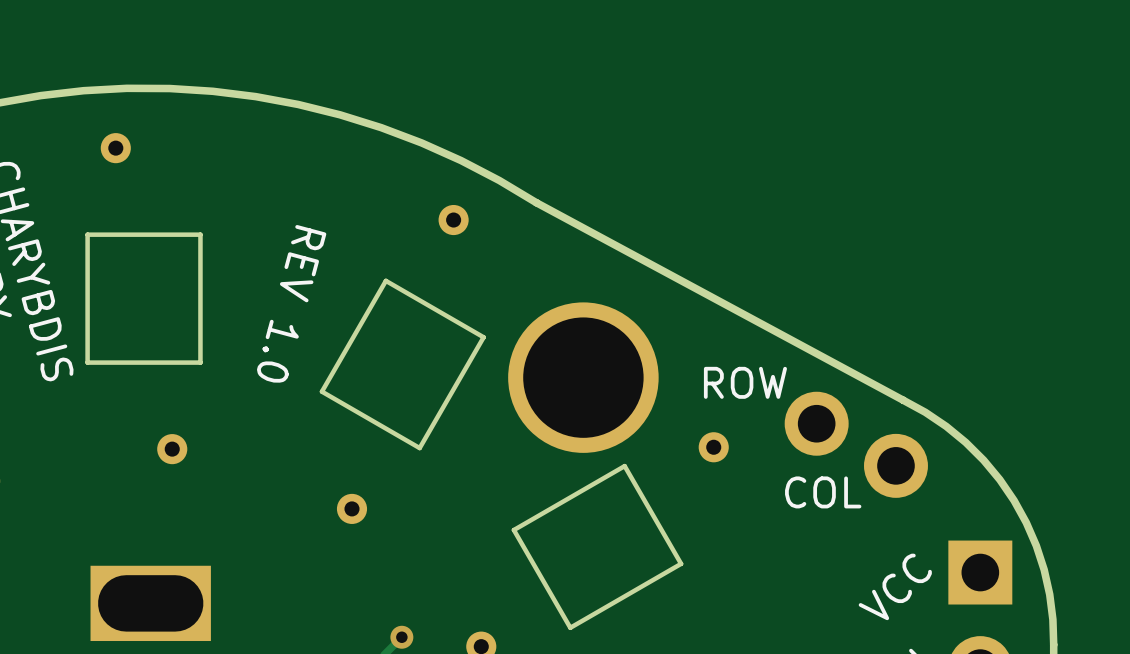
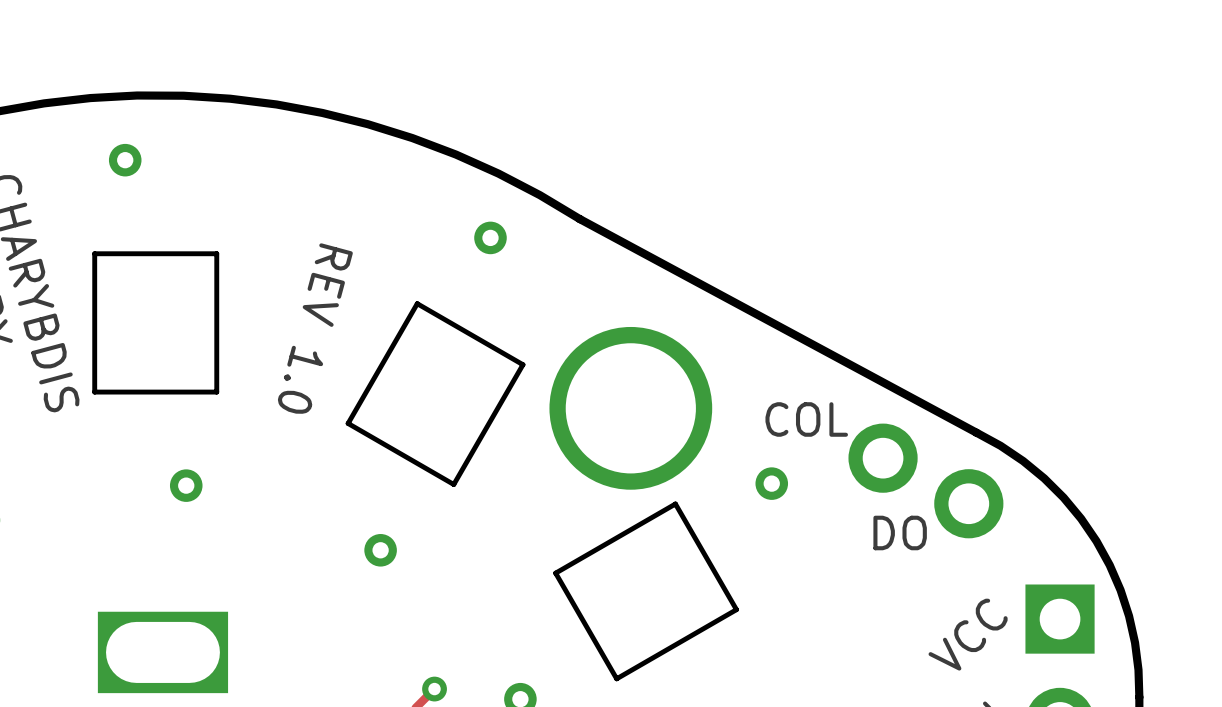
text: ROW (745, 382) -> COL (806, 419)
text: COL (823, 492) -> DO (900, 532)

